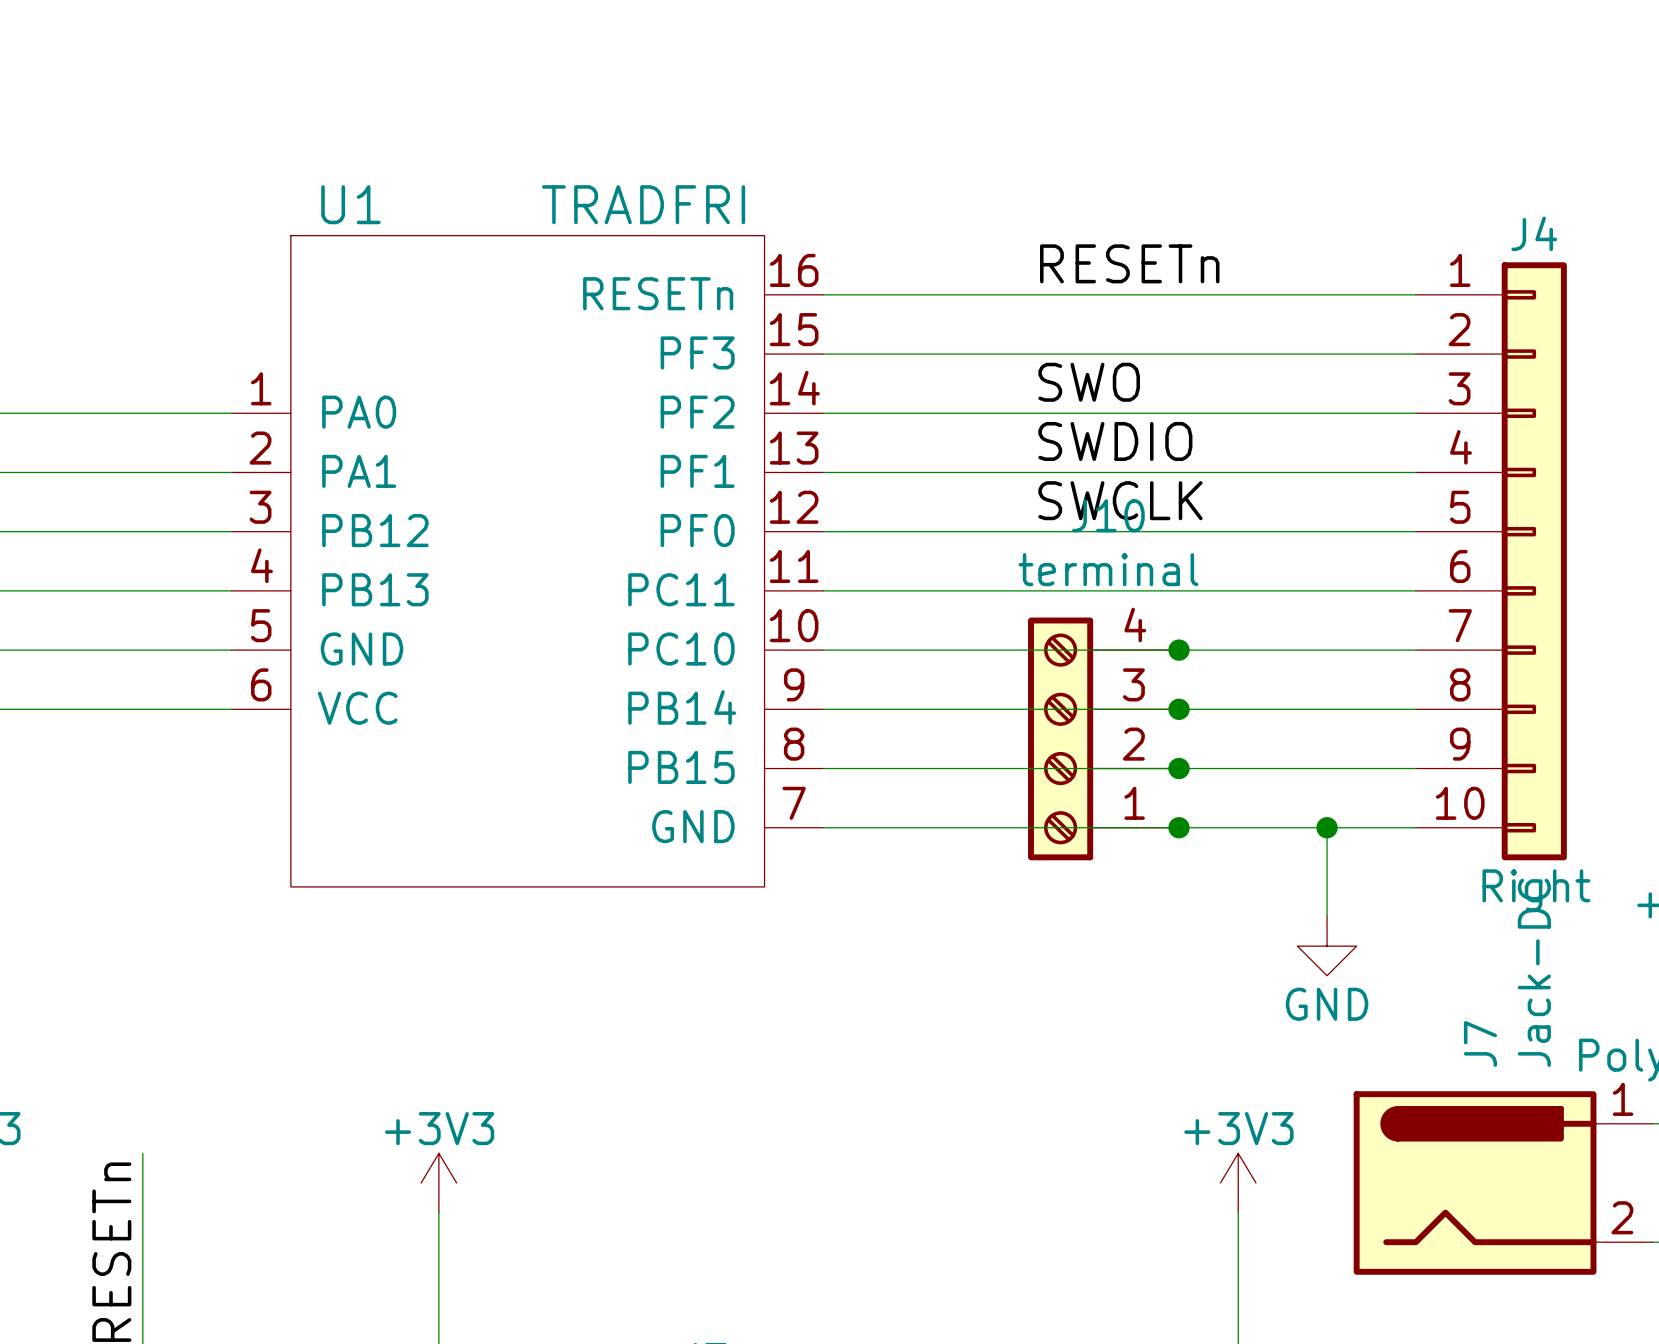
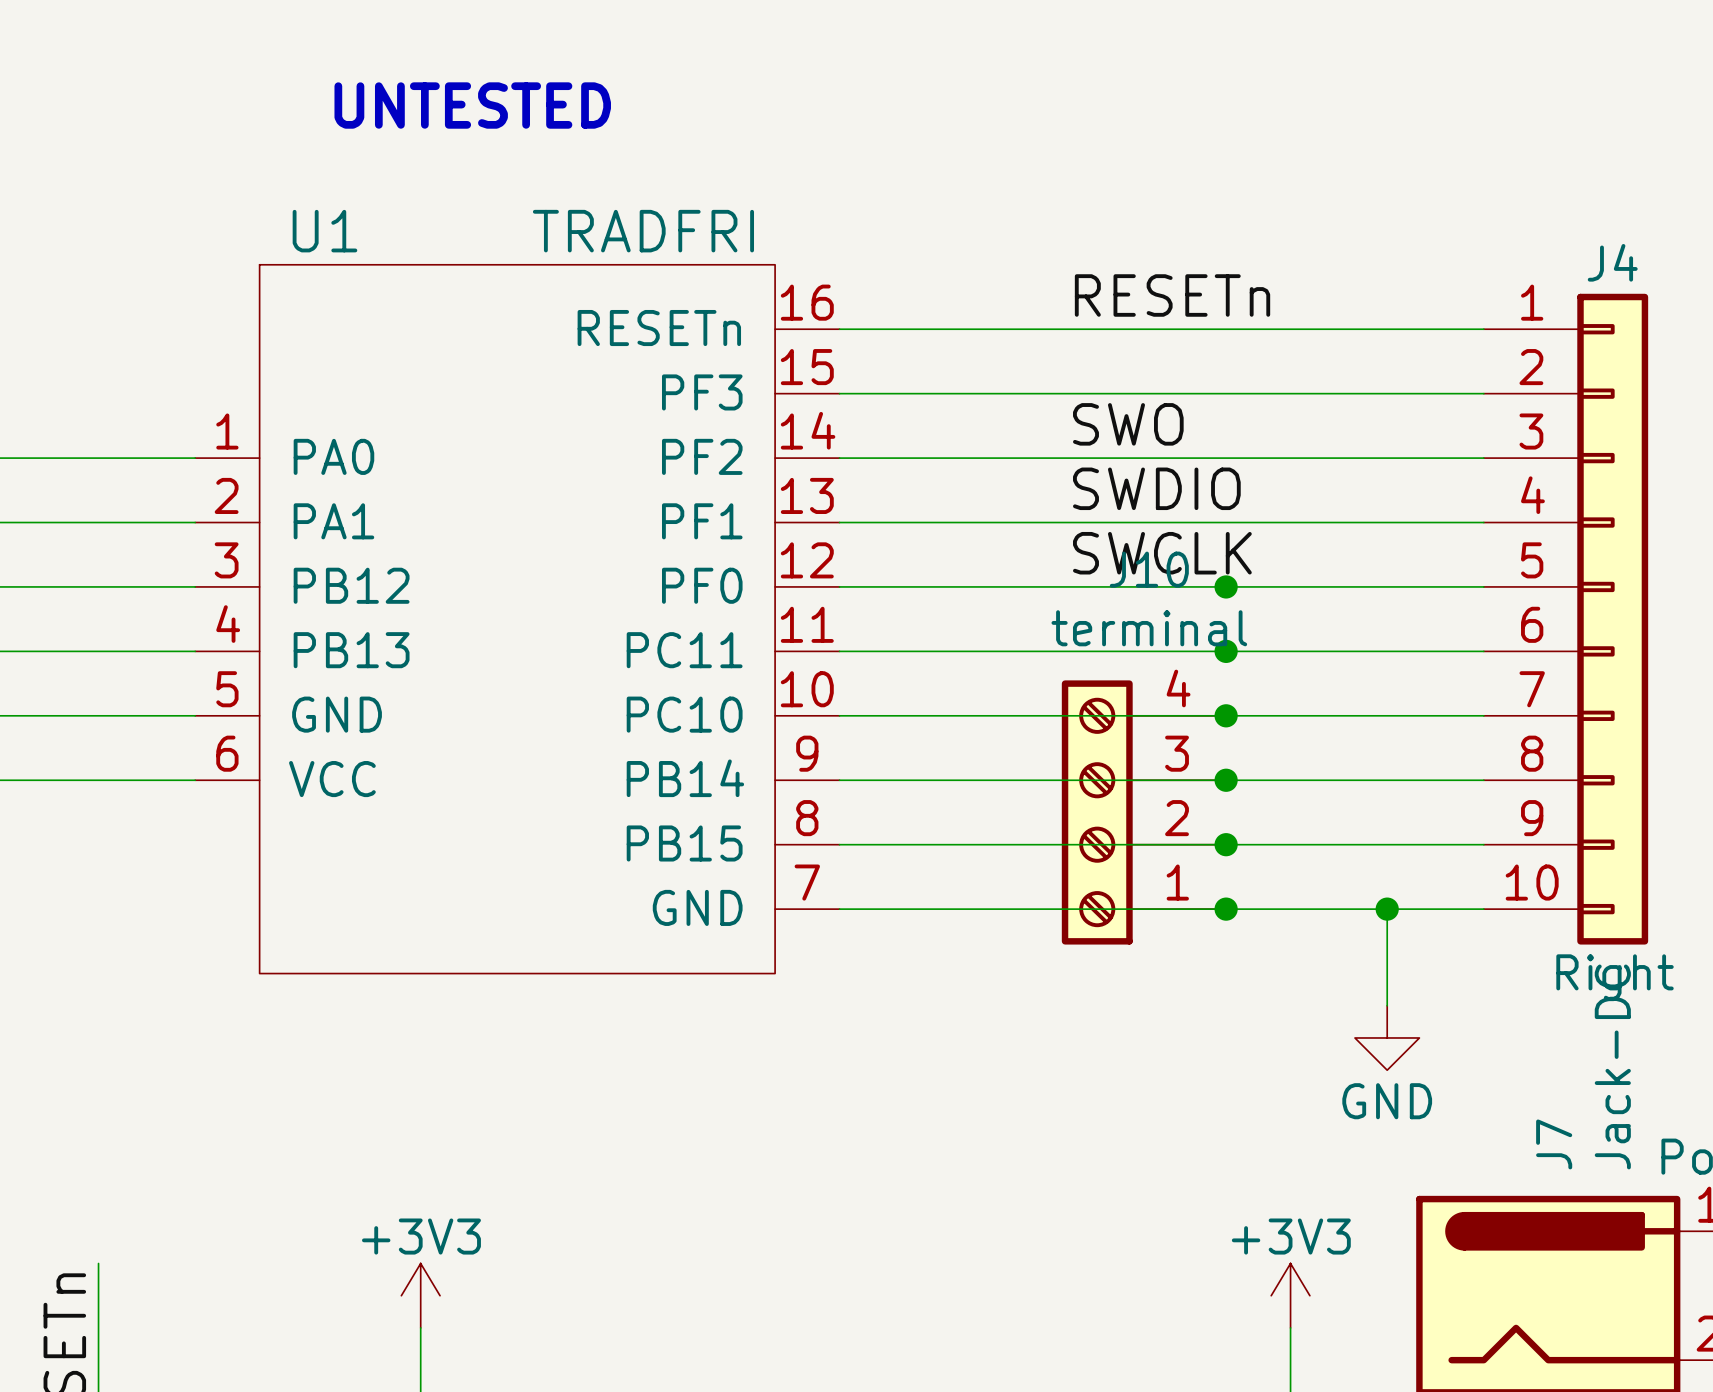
text: none -> UNTESTED (472, 105)
junction: none -> (1226, 586)
junction: none -> (1226, 651)

